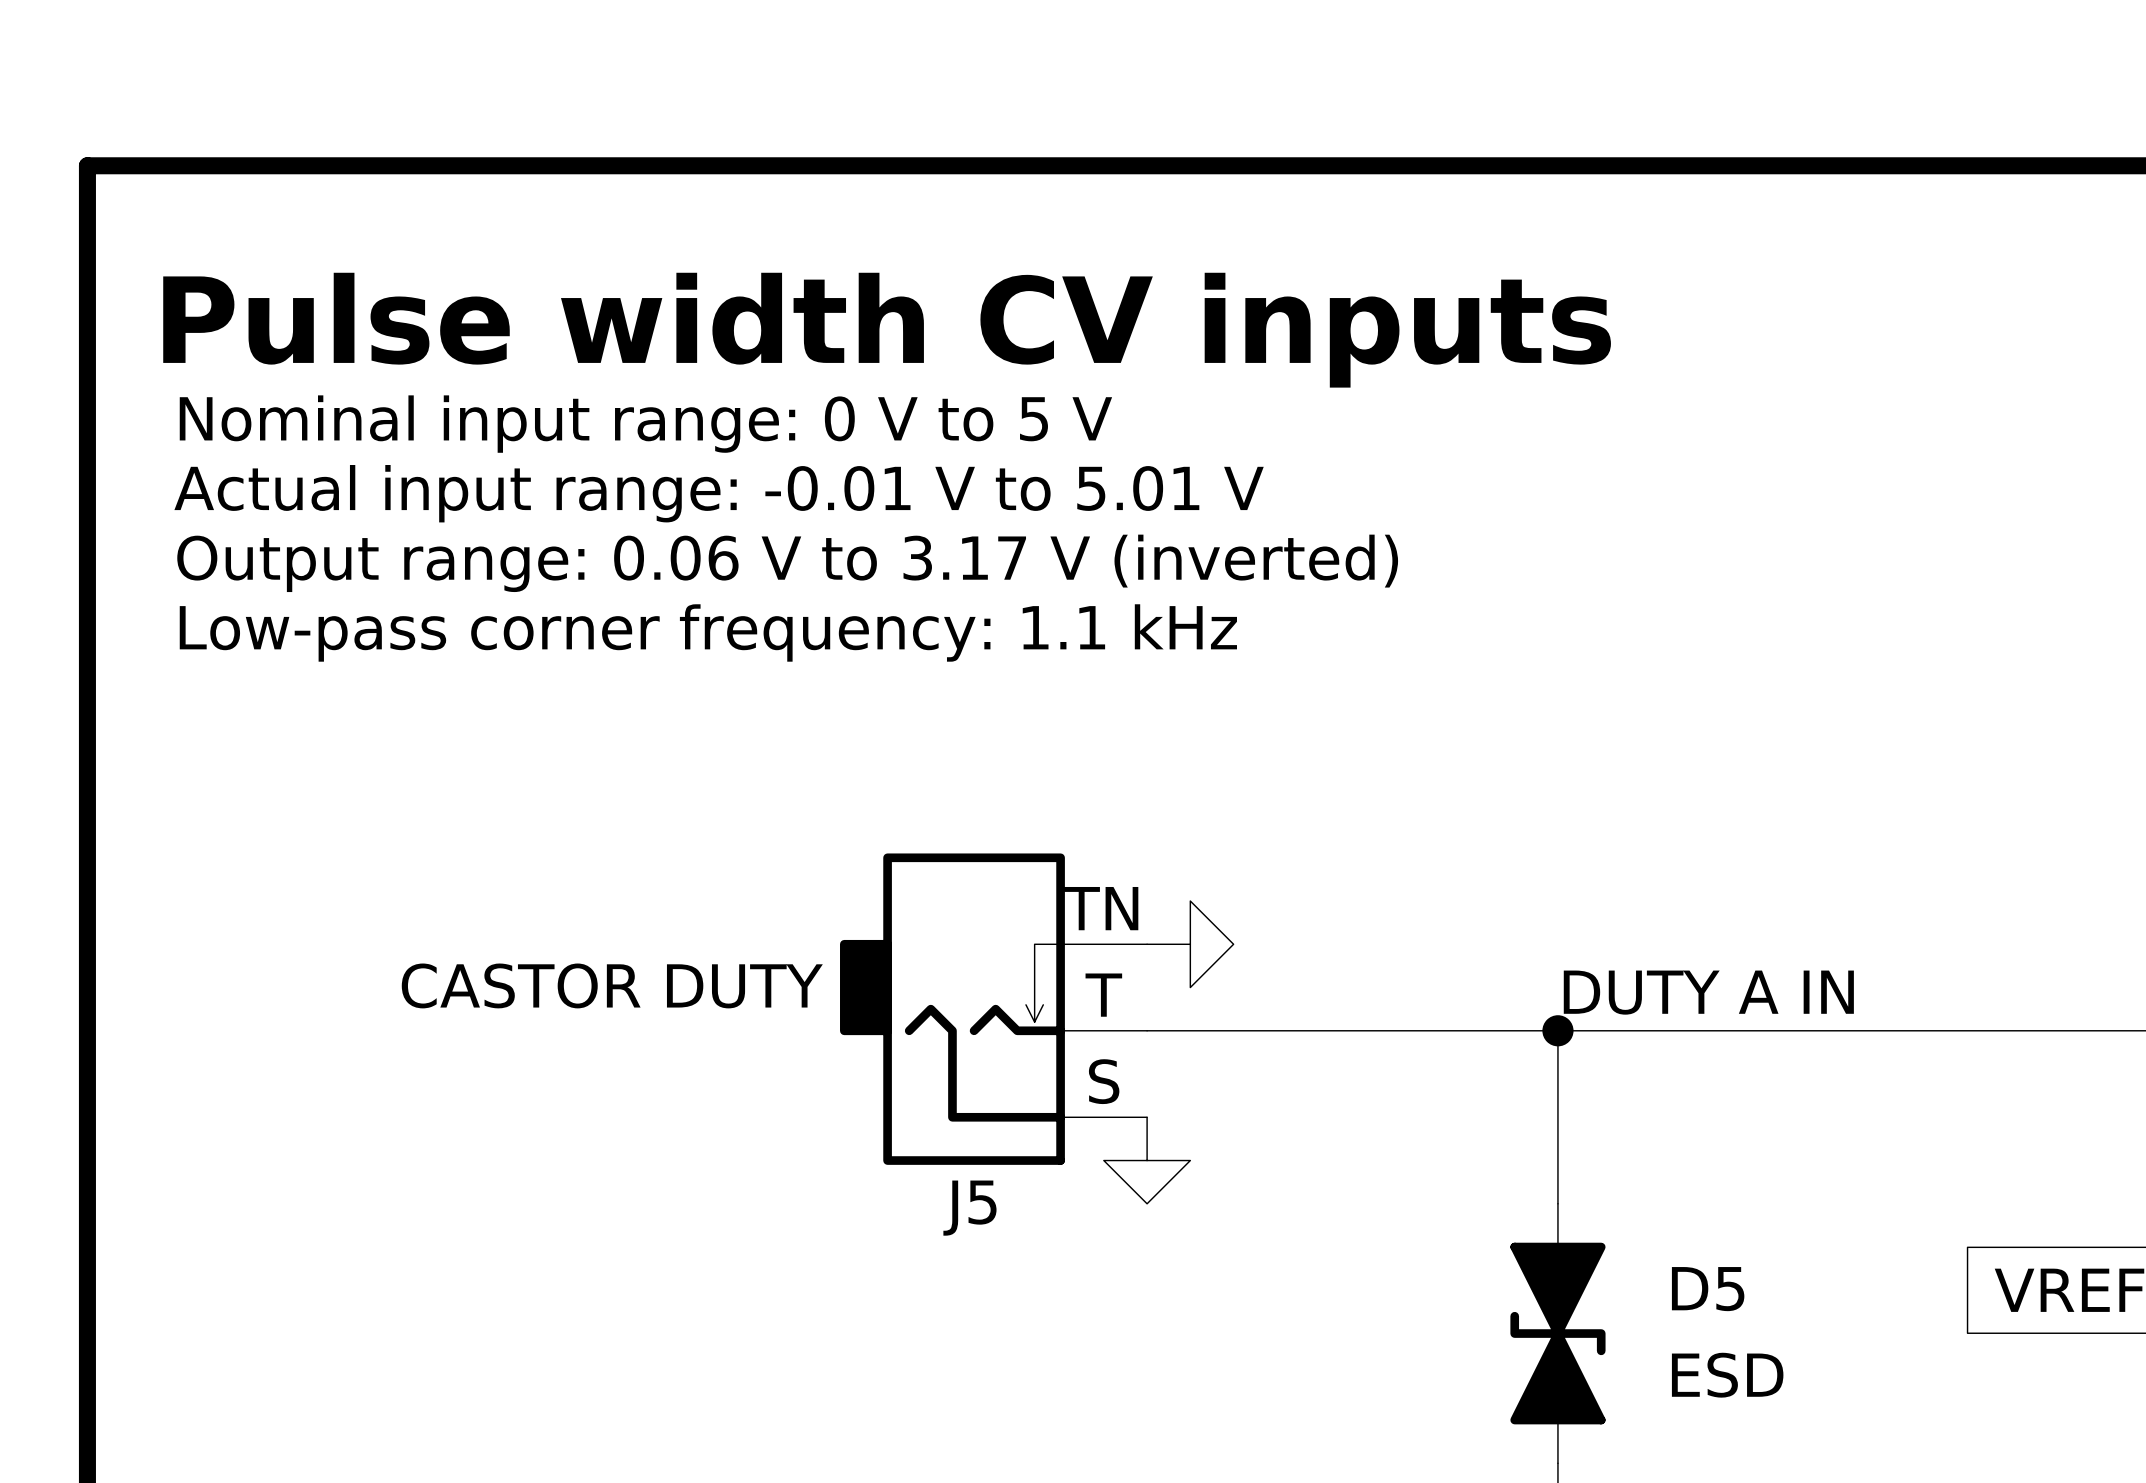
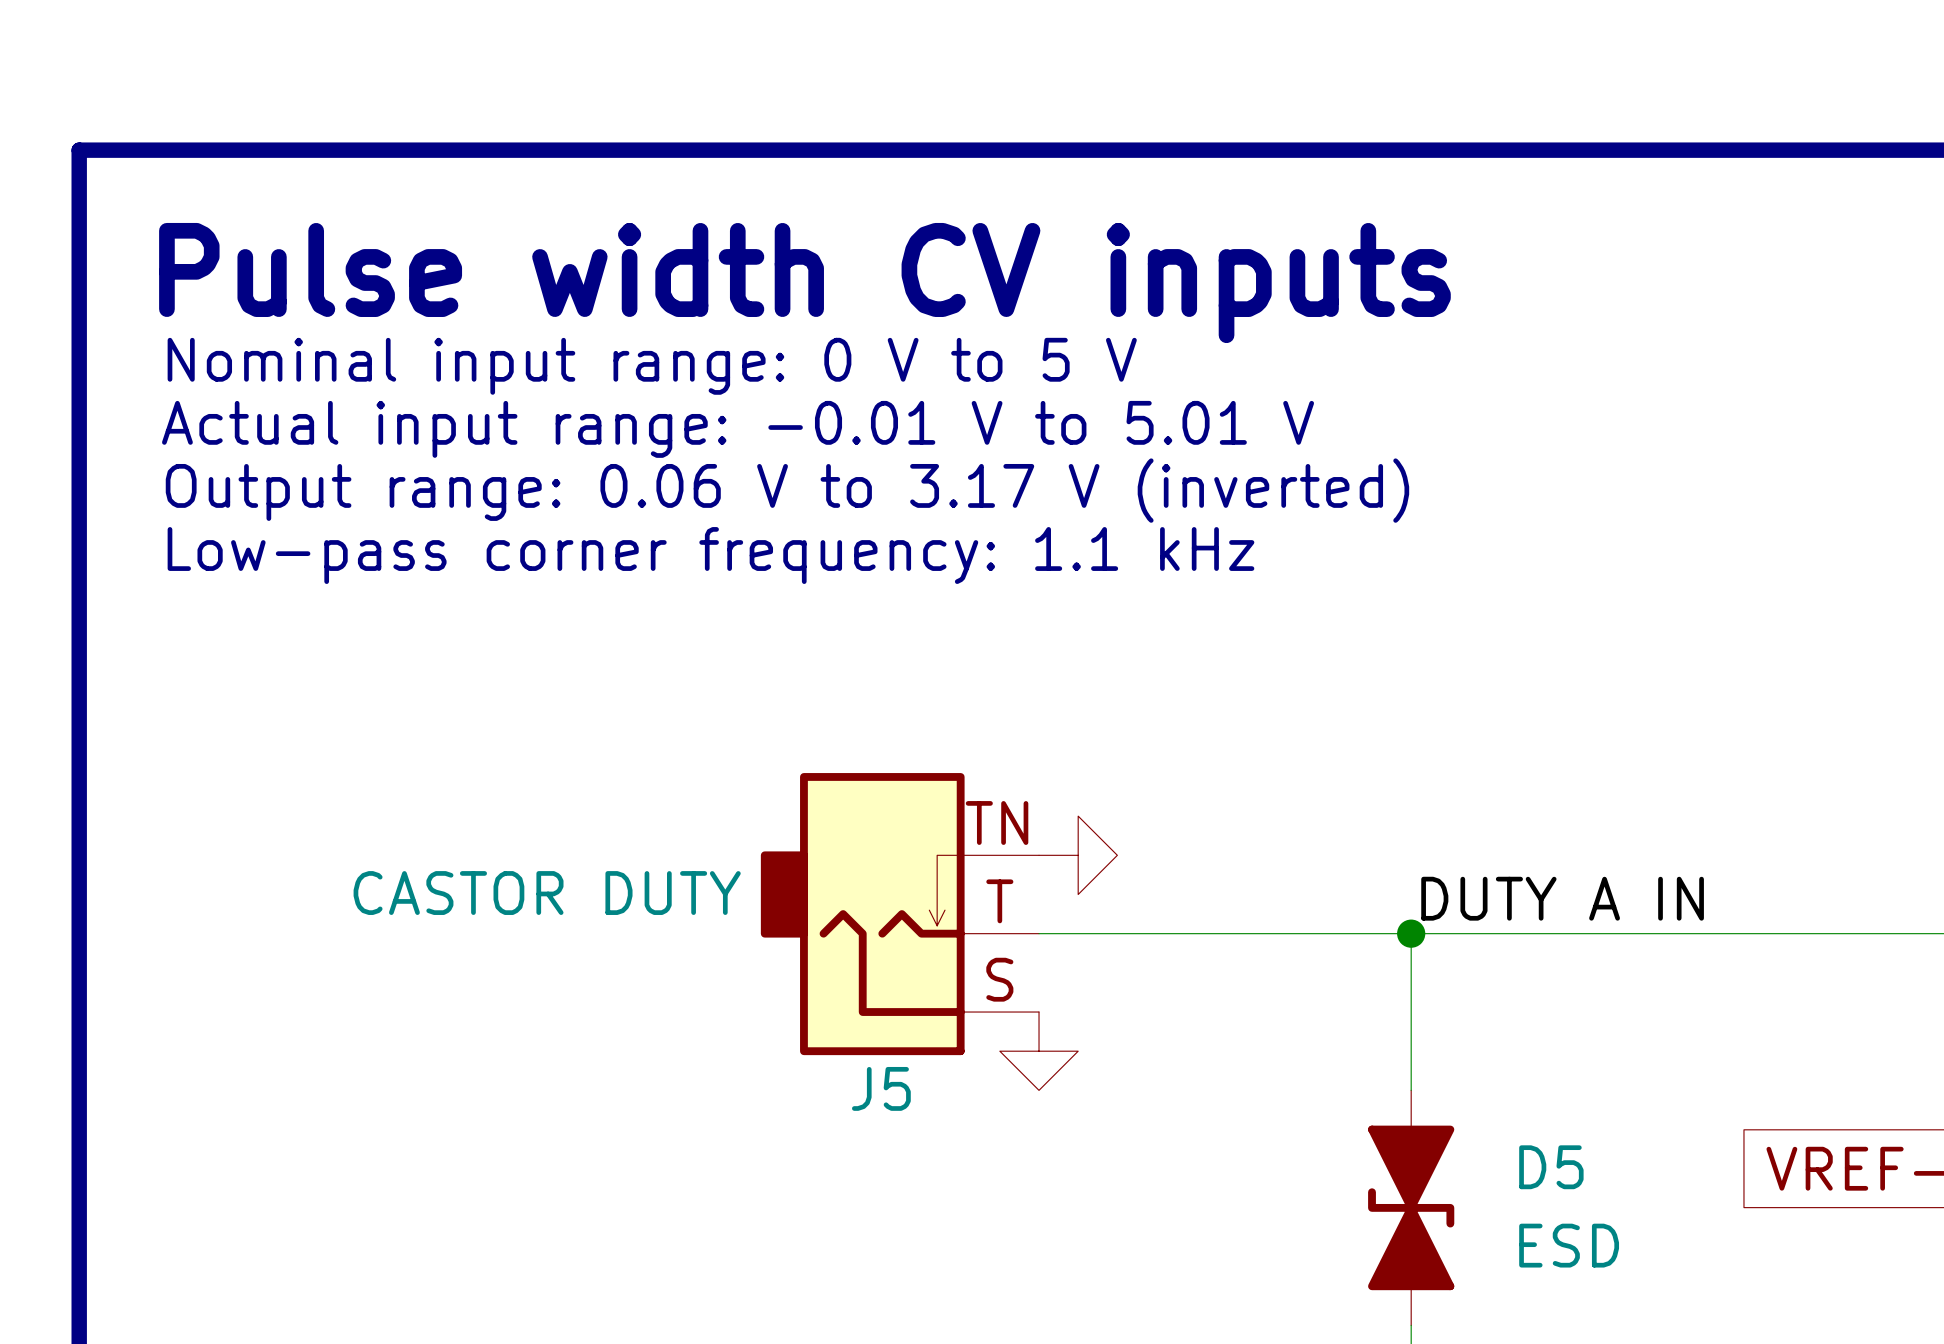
text position: Pulse width CV inputs (887, 330) -> Pulse width CV inputs (804, 283)
text position: Nominal input range: 0 V to 5 V (645, 424) -> Nominal input range: 0 V to 5 V (652, 366)
text position: Actual input range: -0.01 V to 5.01 V (719, 493) -> Actual input range: -0.01 V to 5.01 V (738, 429)
text position: Output range: 0.06 V to 3.17 V (inverted) (787, 563) -> Output range: 0.06 V to 3.17 V (inverted) (787, 490)
text position: Low-pass corner frequency: 1.1 kHz (708, 632) -> Low-pass corner frequency: 1.1 kHz (710, 555)

